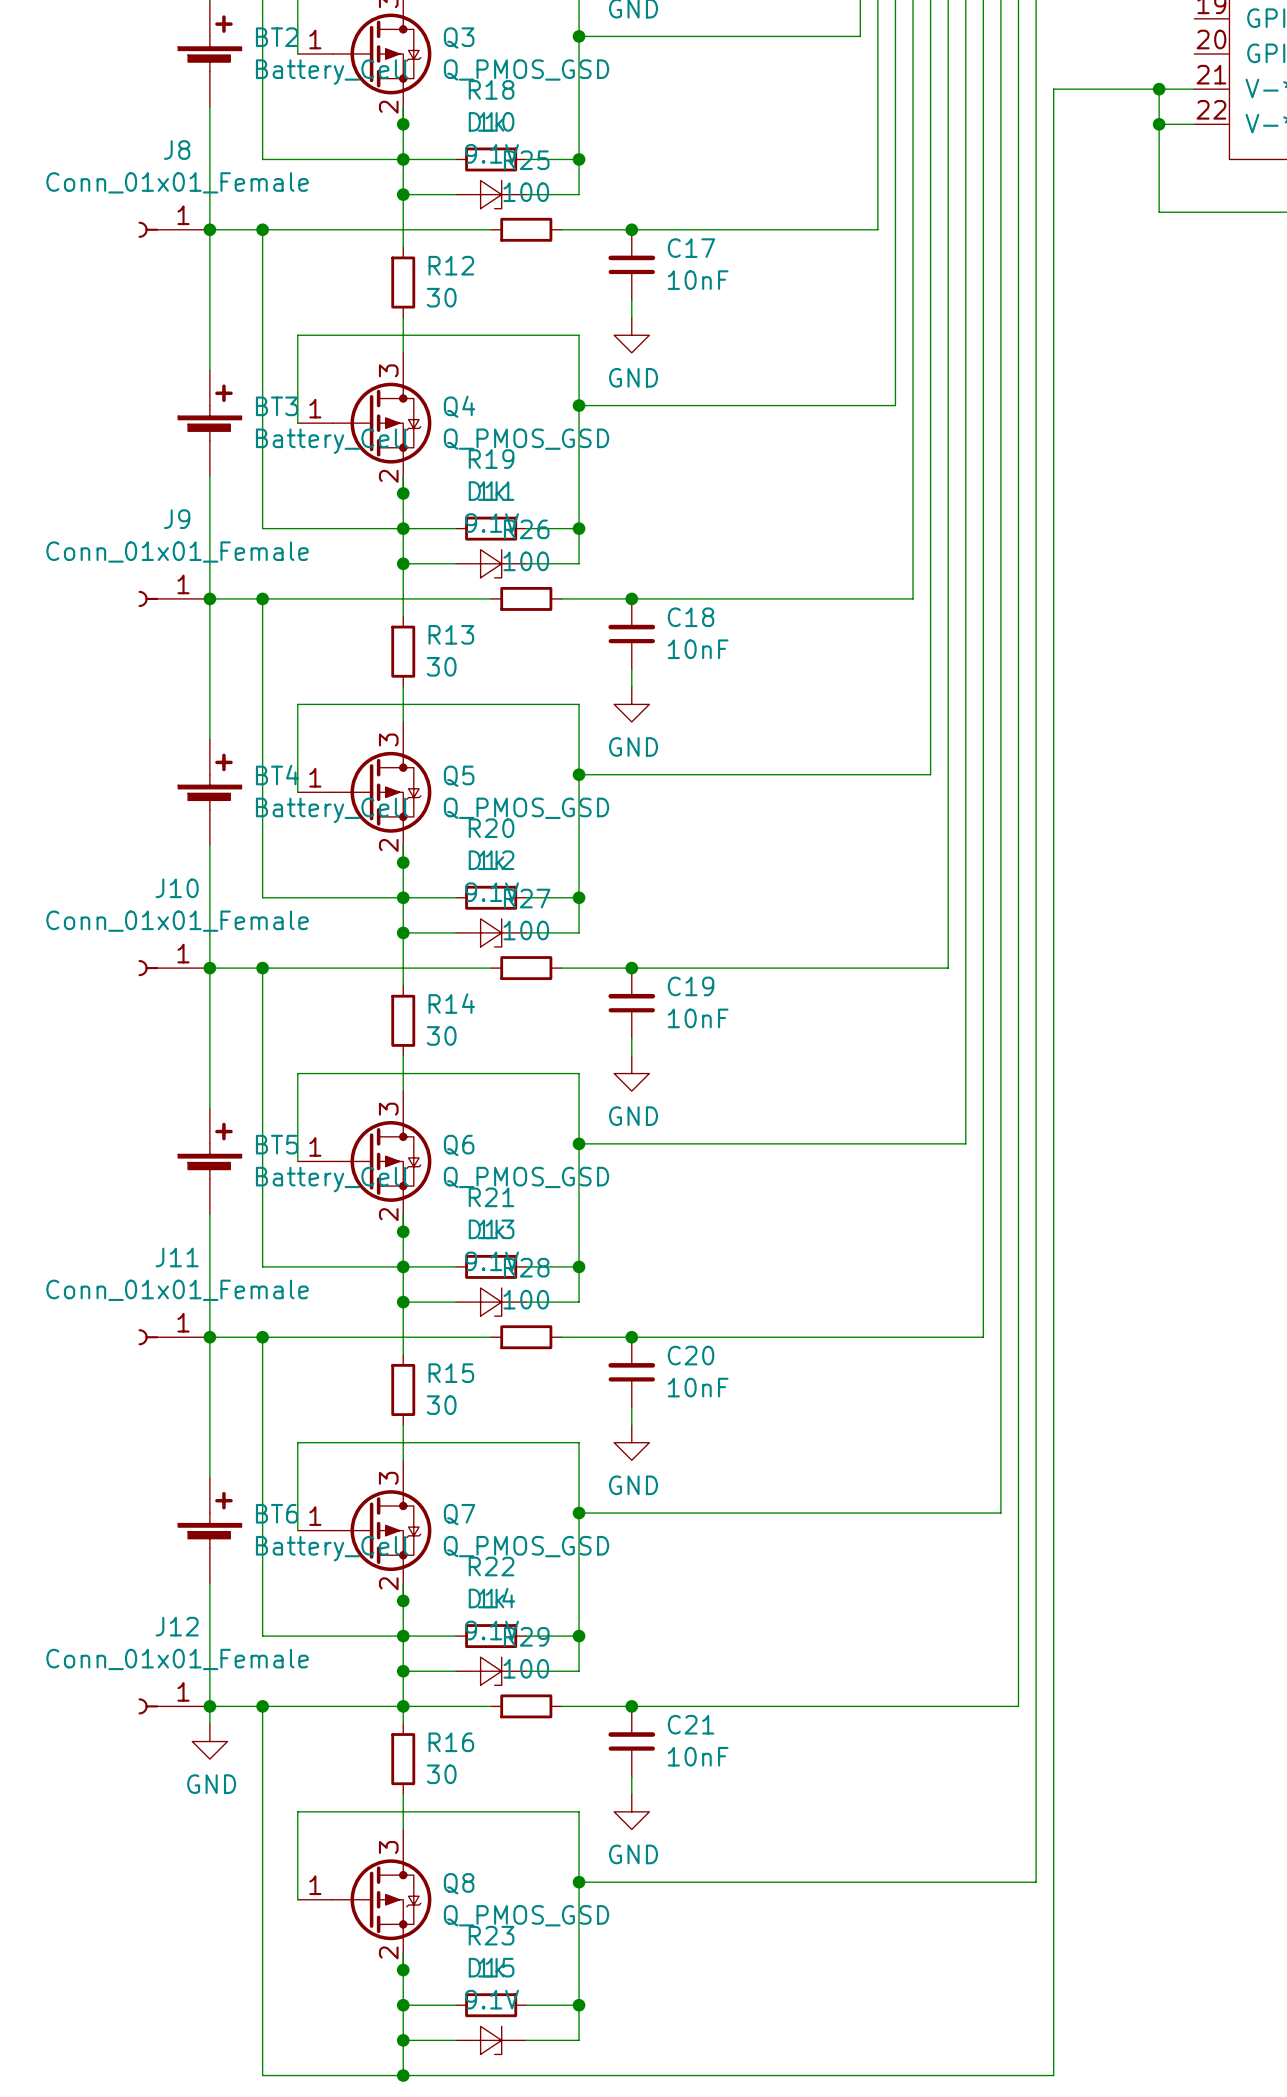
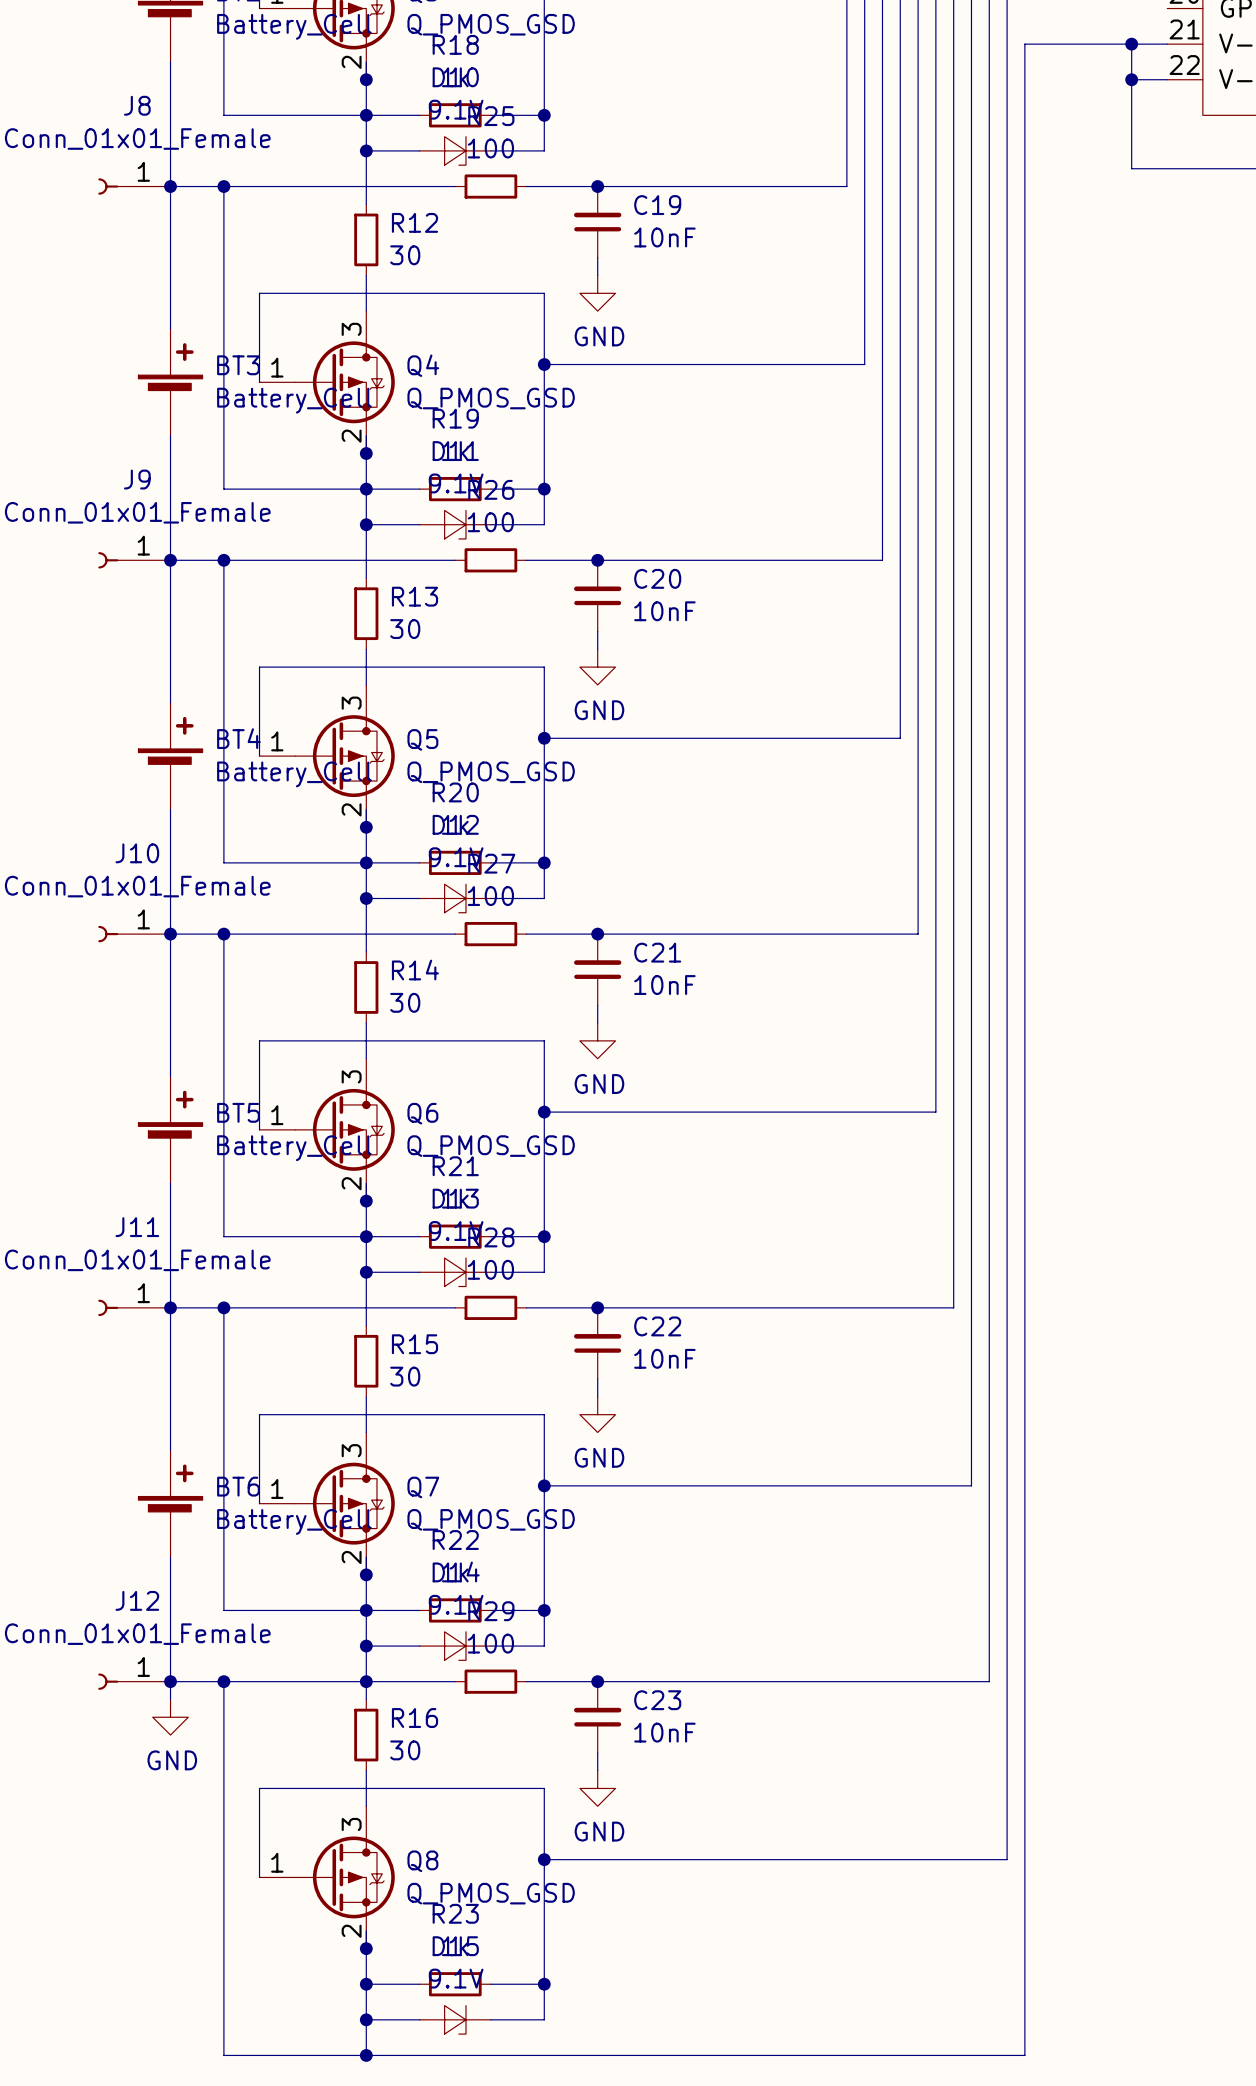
C17 name: C17 (691, 248) -> C19 (657, 205)
C18 name: C18 (691, 617) -> C20 (657, 578)
C19 name: C19 (691, 986) -> C21 (657, 952)
C20 name: C20 (691, 1355) -> C22 (657, 1326)
C21 name: C21 (691, 1724) -> C23 (657, 1700)

